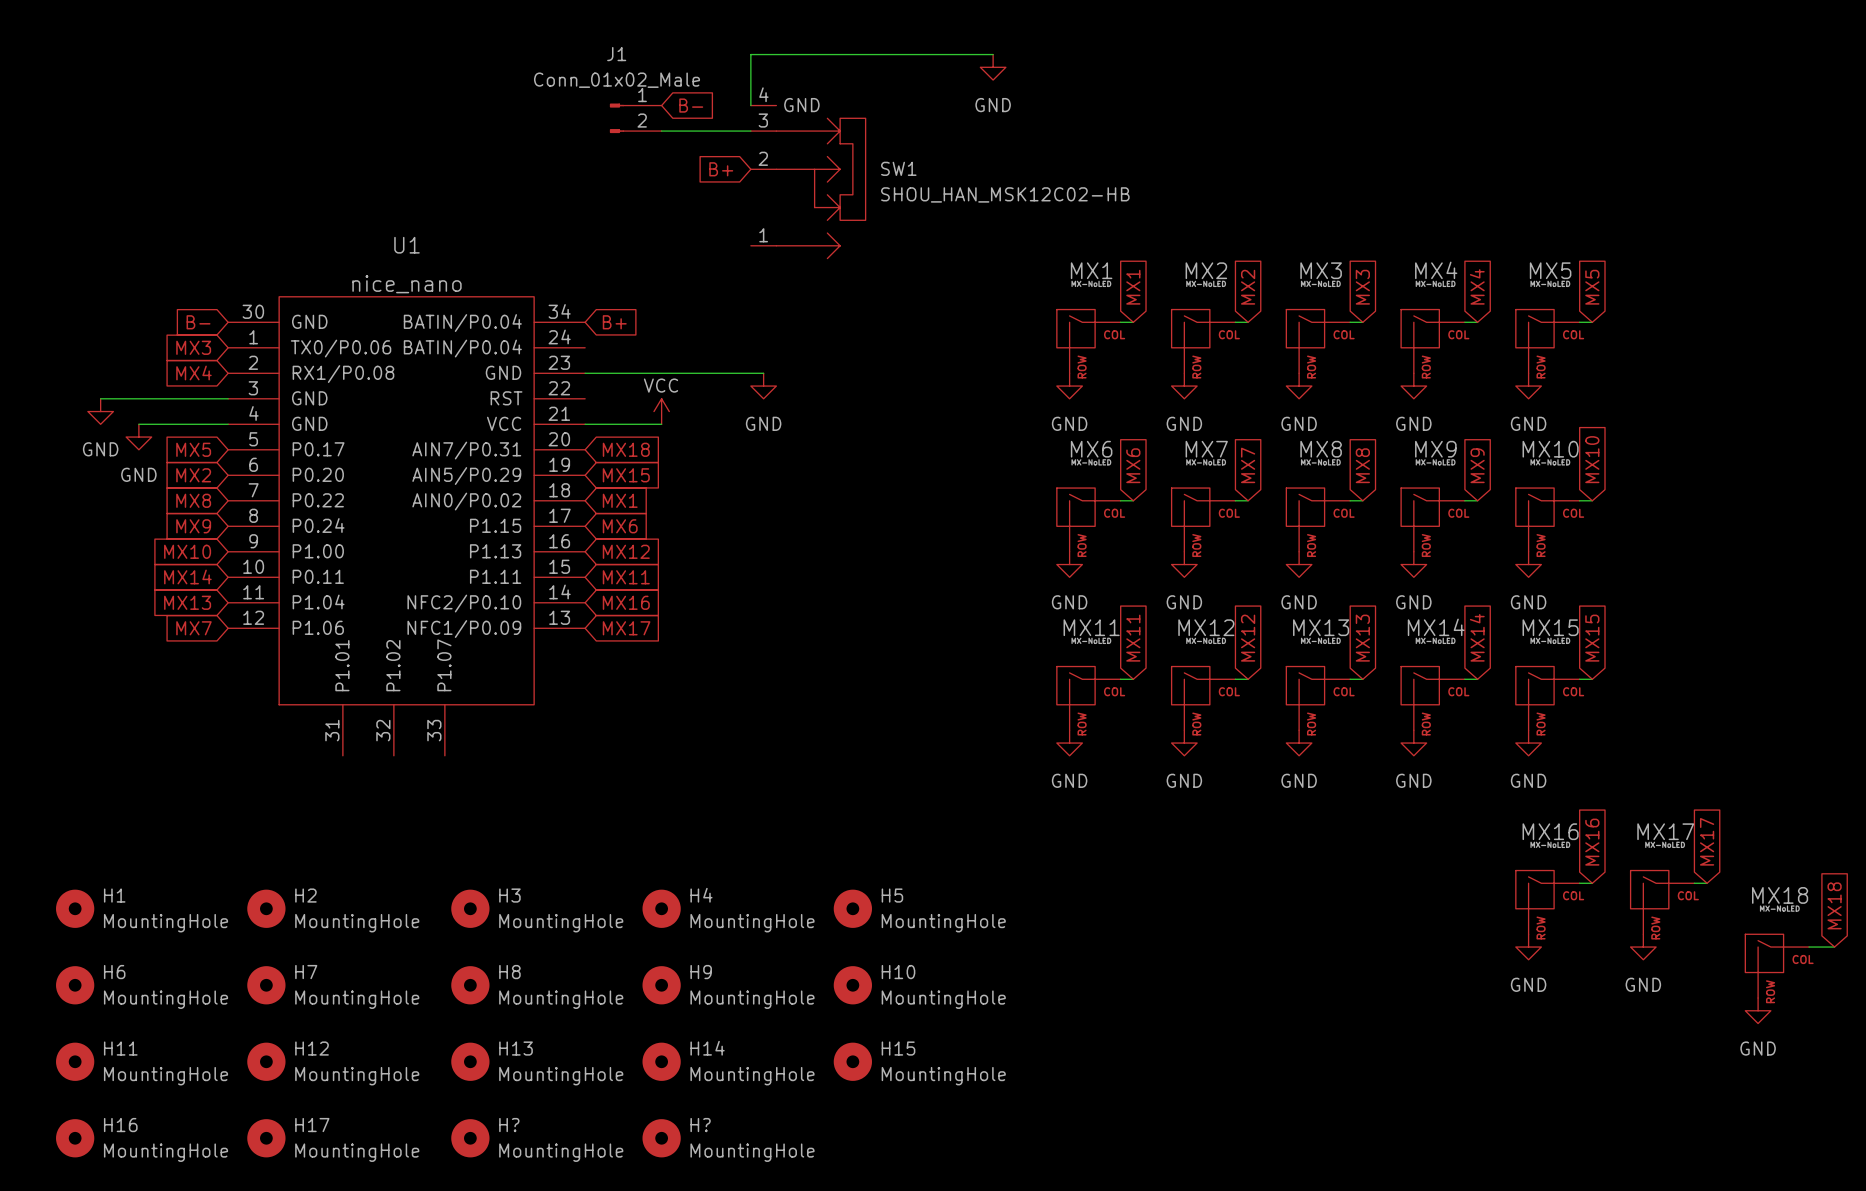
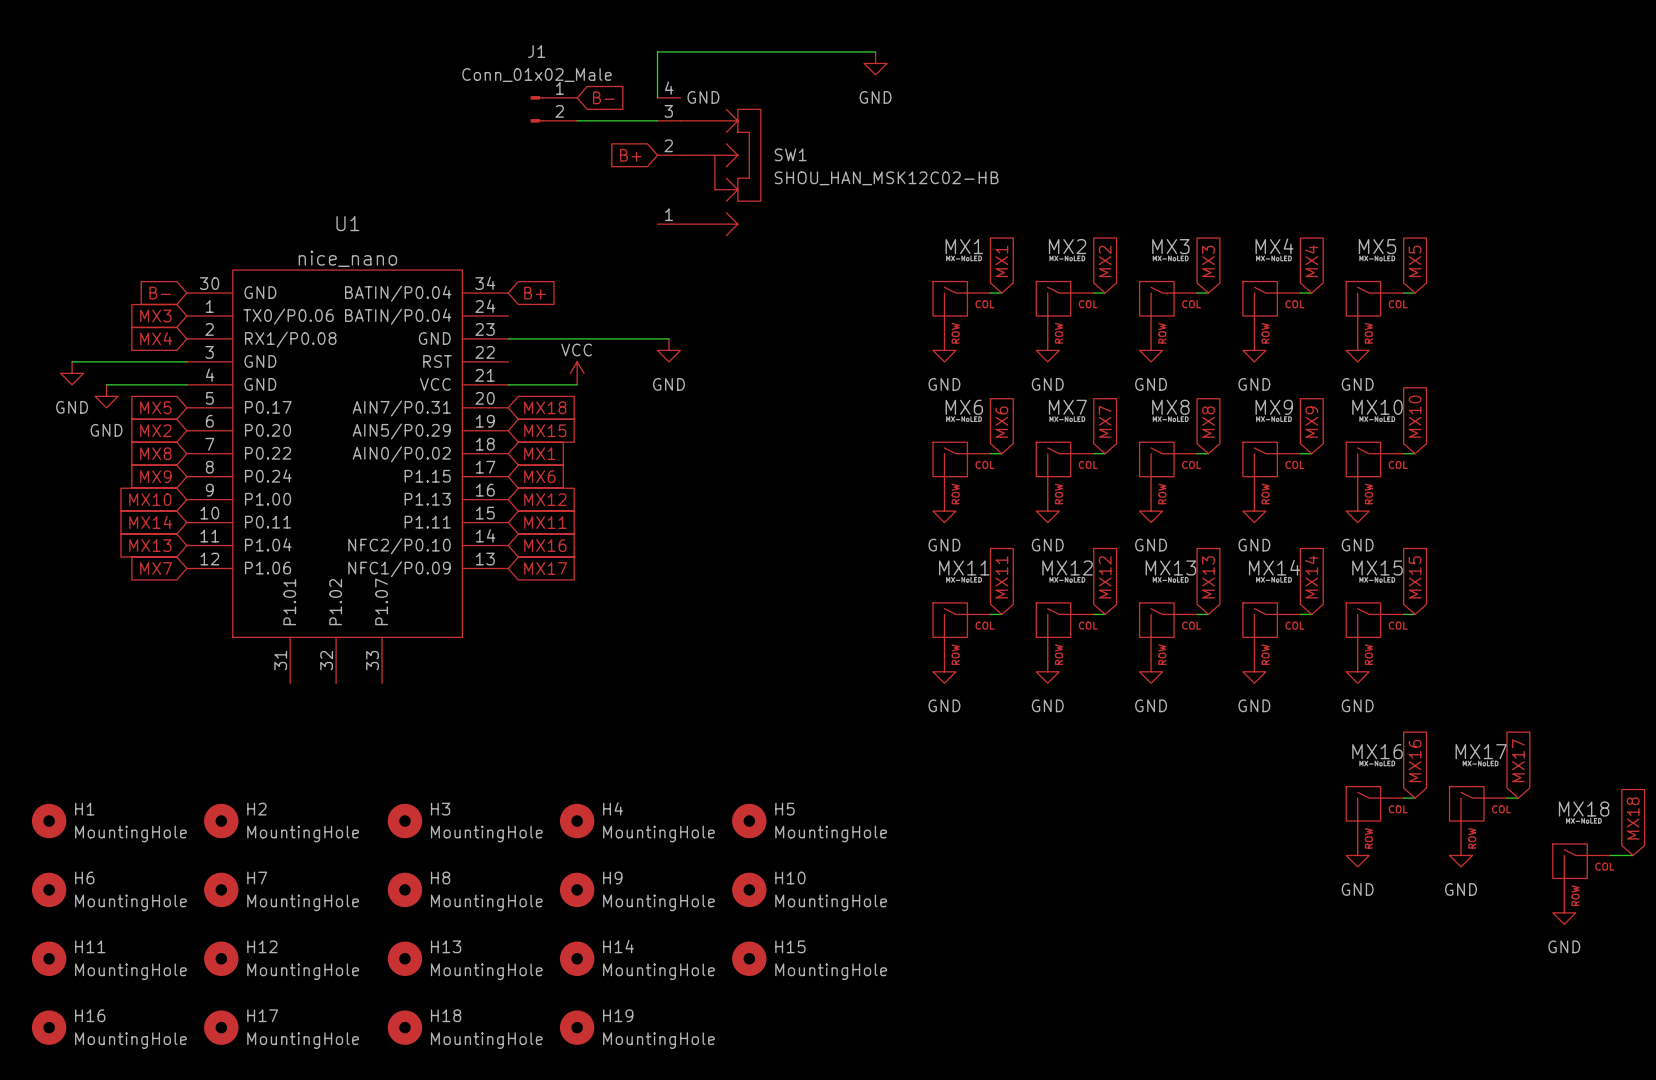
H? name: H? (509, 1125) -> H18 (446, 1015)
H? name: H? (700, 1125) -> H19 (618, 1015)

